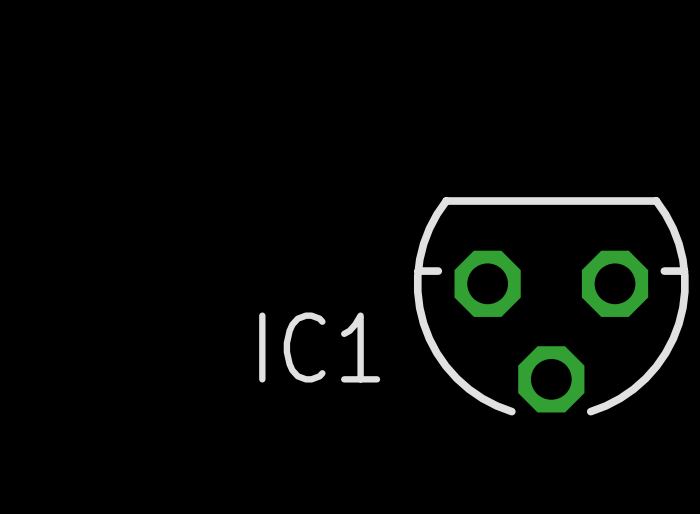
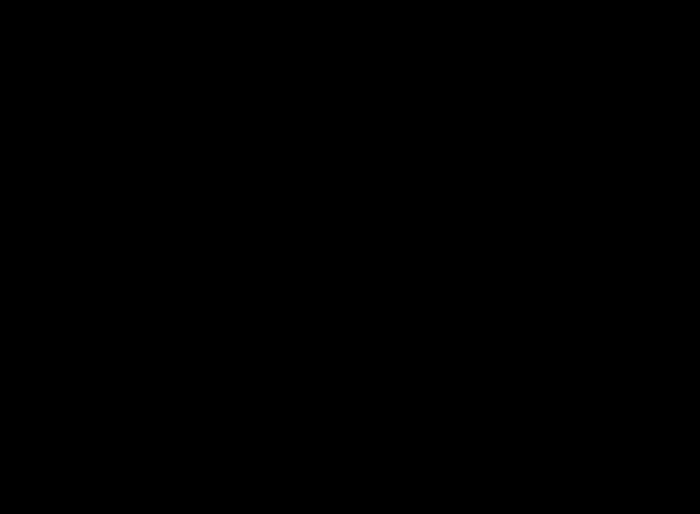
IC1: (551, 306) -> none

